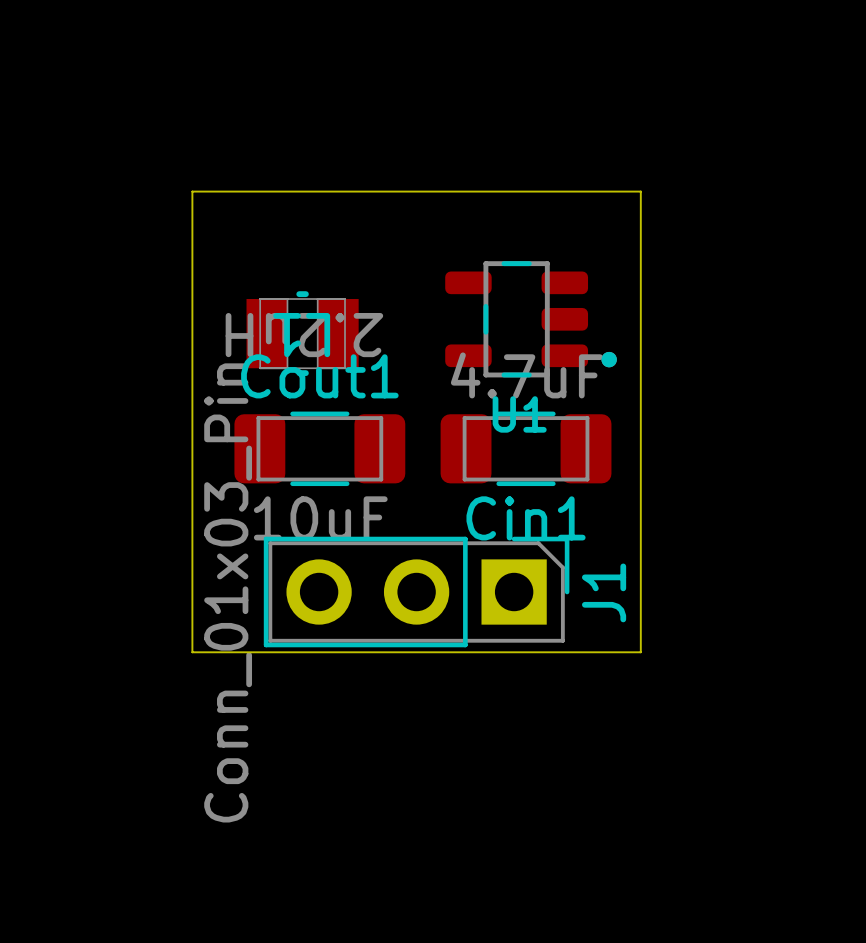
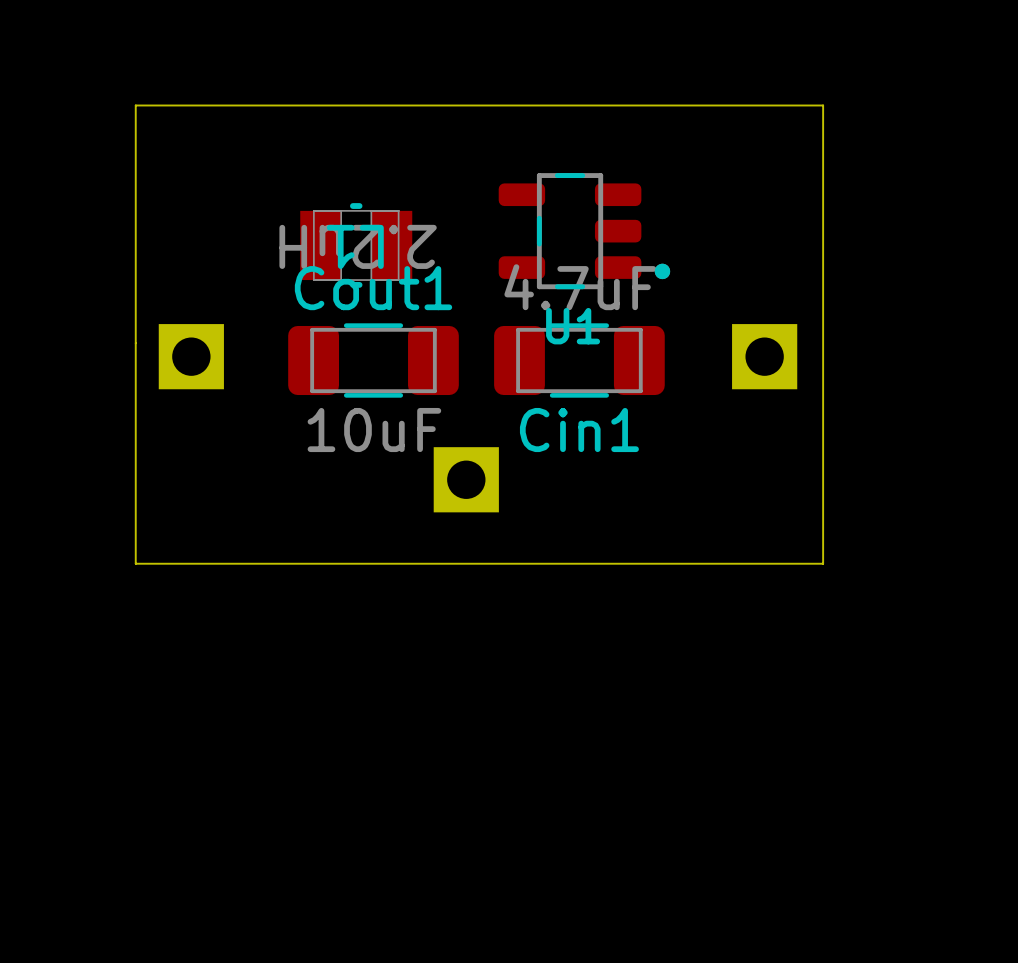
part: none -> (191, 356)
part: none -> (764, 356)
part: none -> (466, 479)
J1: Conn_01x03_Pin (416, 592) -> none
board edge: (192, 652) (192, 191) (640, 191) (640, 652) -> (246, 563) (135, 563) (135, 105) (823, 105) (823, 563) (694, 563)

